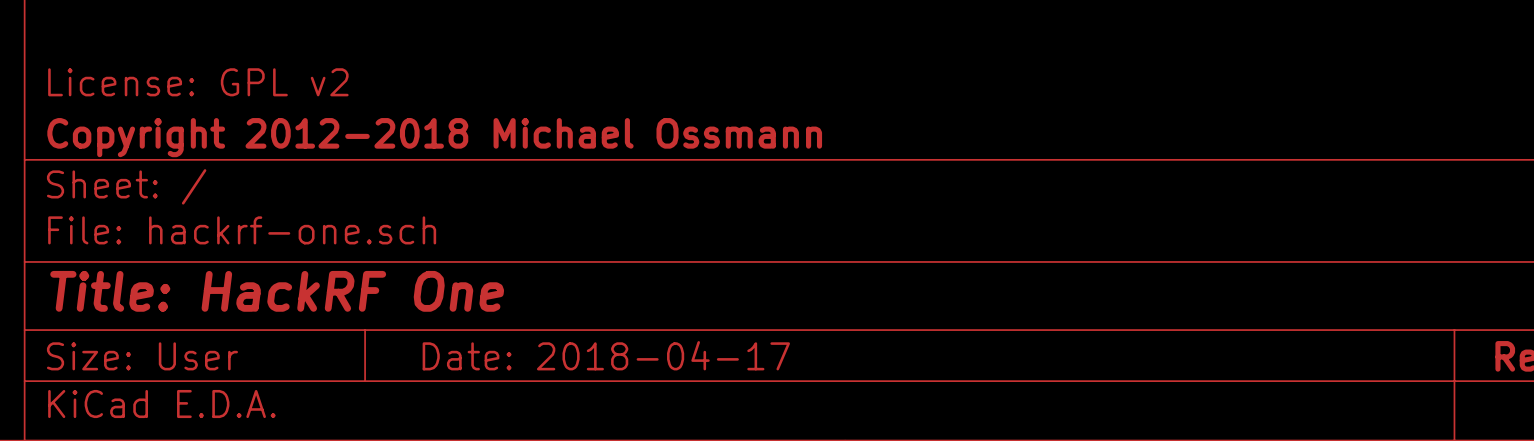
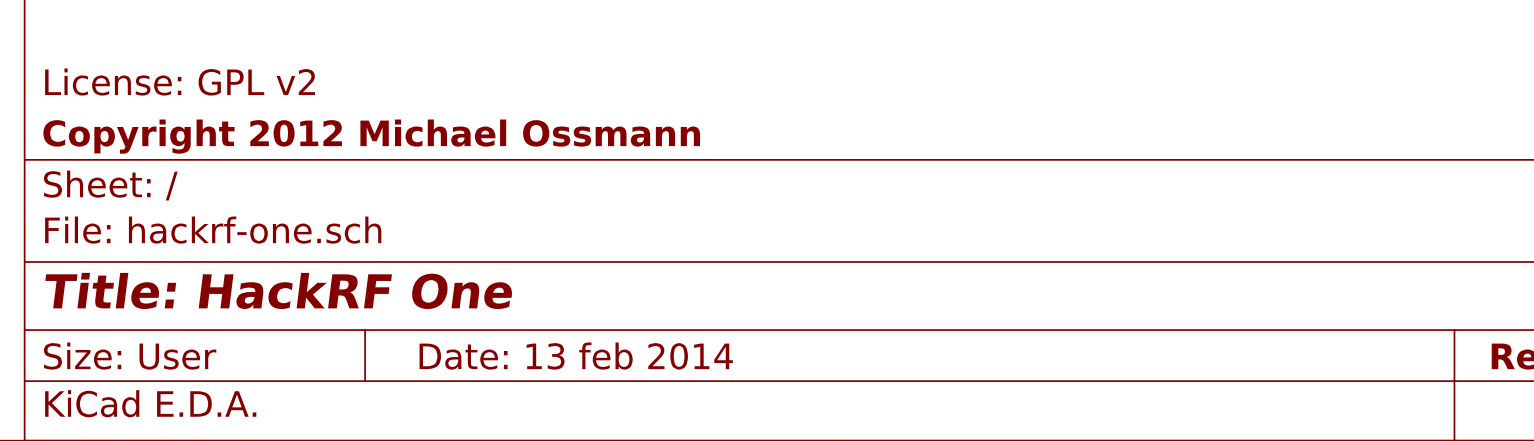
title block: Copyright 2012-2018 Michael Ossmann (434, 137) -> Copyright 2012 Michael Ossmann (371, 136)
title block: Date: 2018-04-17 (606, 355) -> Date: 13 feb 2014 (576, 356)

